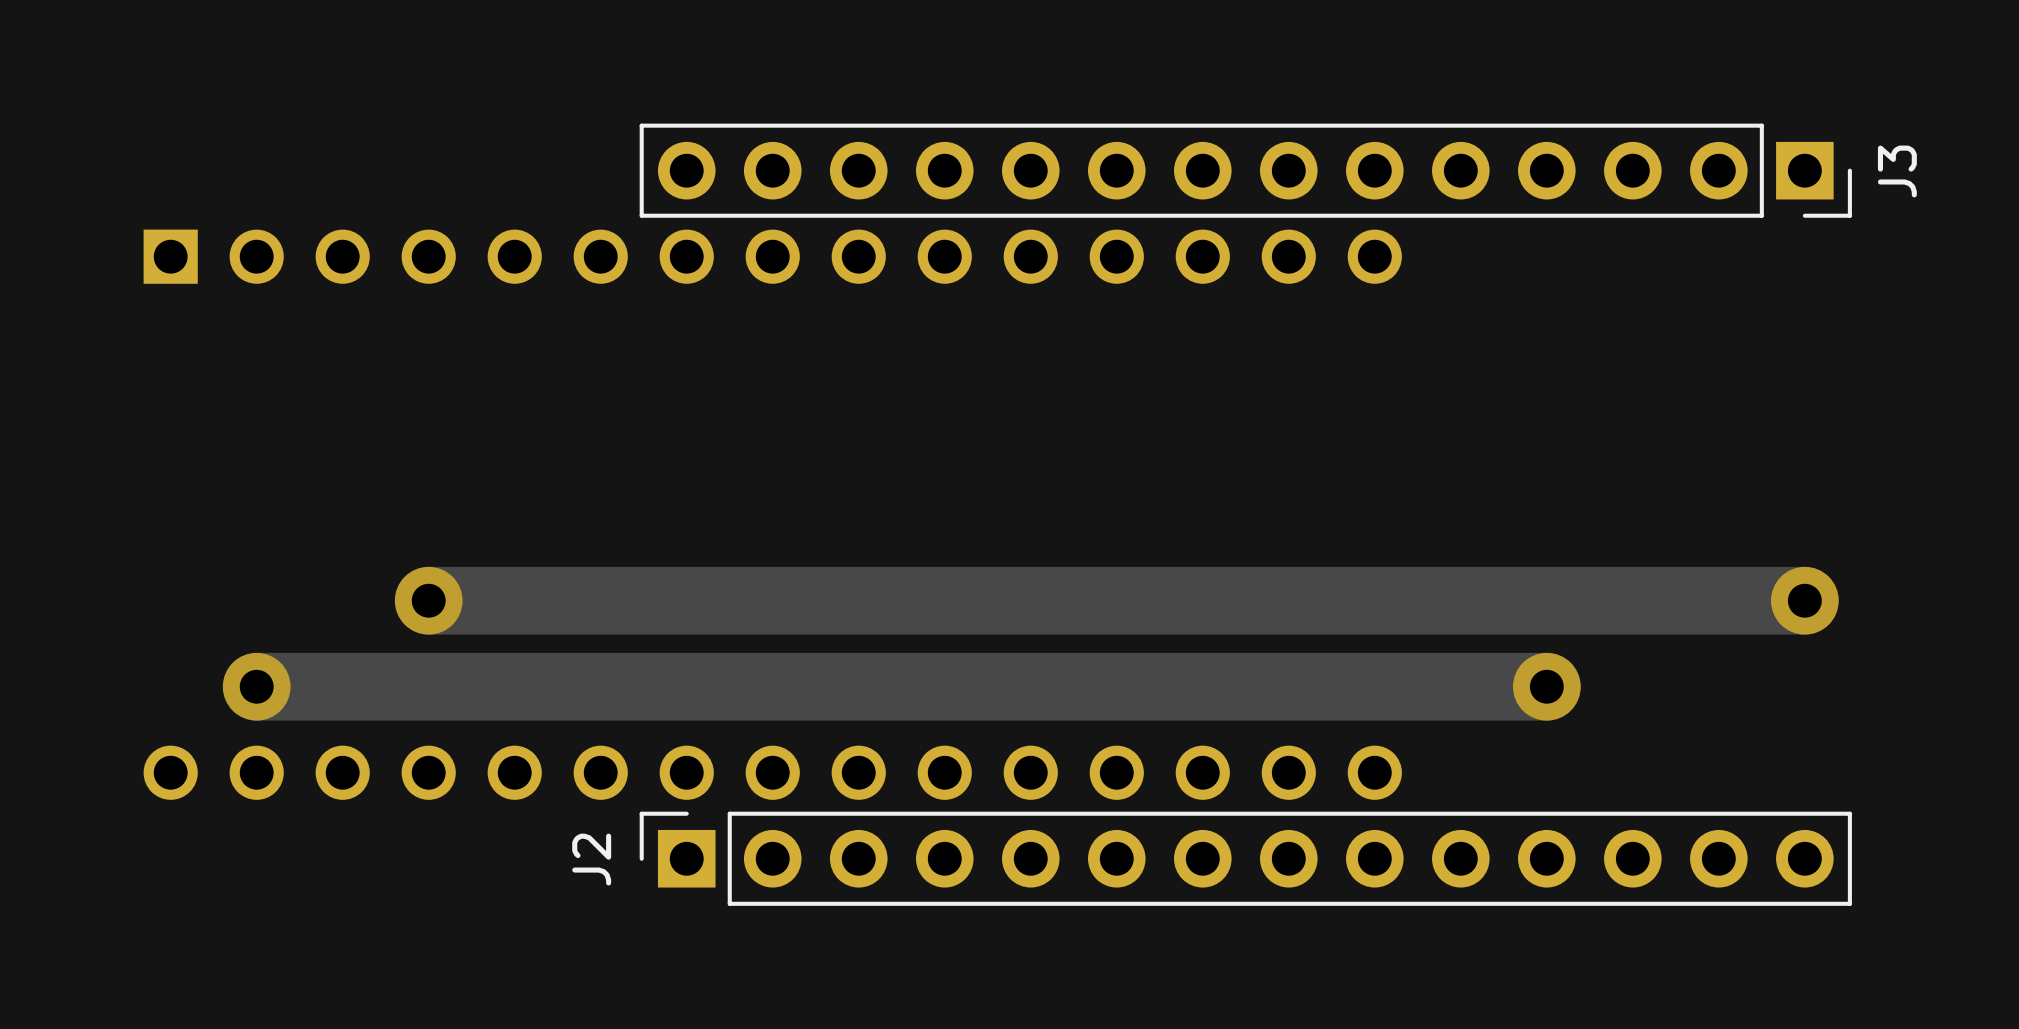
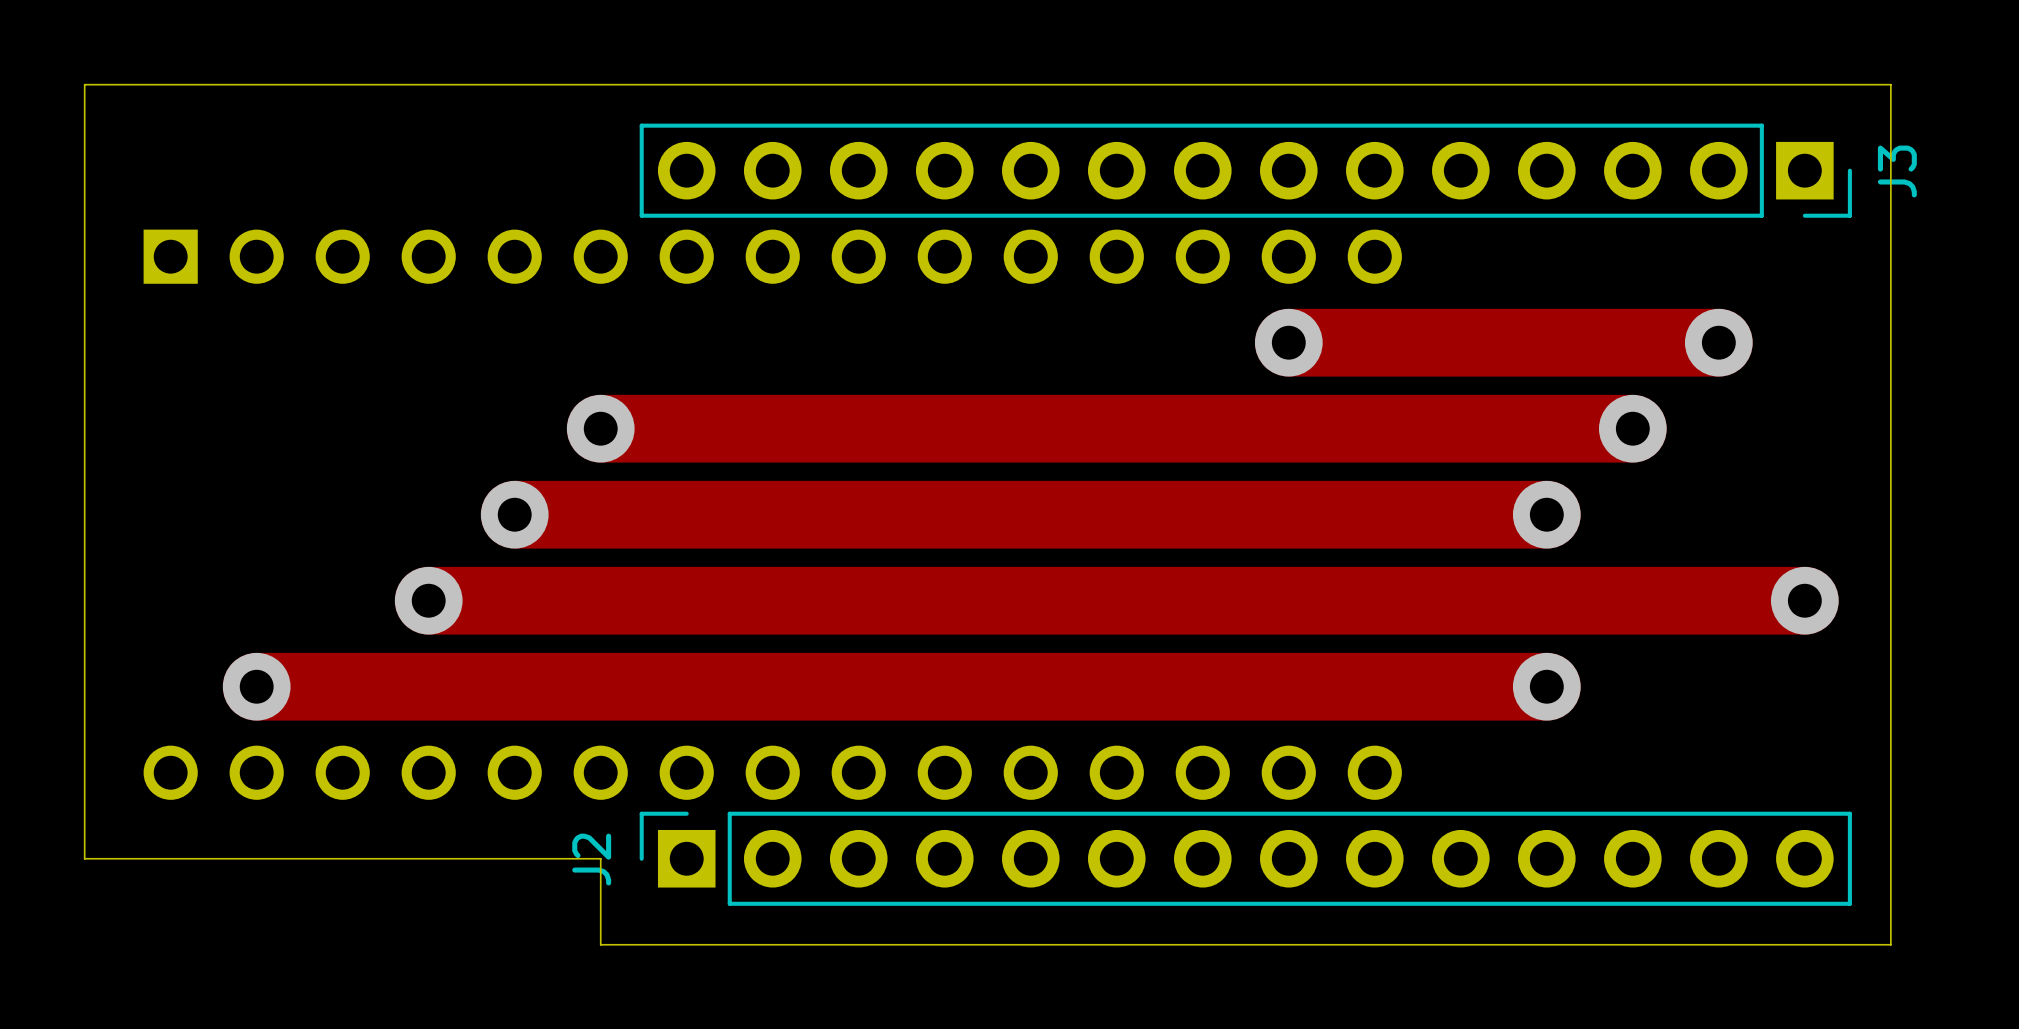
board edge: none -> (84, 84) (1890, 84) (1890, 944) (600, 944) (600, 858) (84, 858) (84, 84)
track: none -> (1288, 342) (1718, 342)
via: none -> (1288, 342)
via: none -> (1718, 342)
track: none -> (600, 428) (1632, 428)
via: none -> (600, 428)
via: none -> (1632, 428)
track: none -> (514, 514) (1546, 514)
via: none -> (514, 514)
via: none -> (1546, 514)

